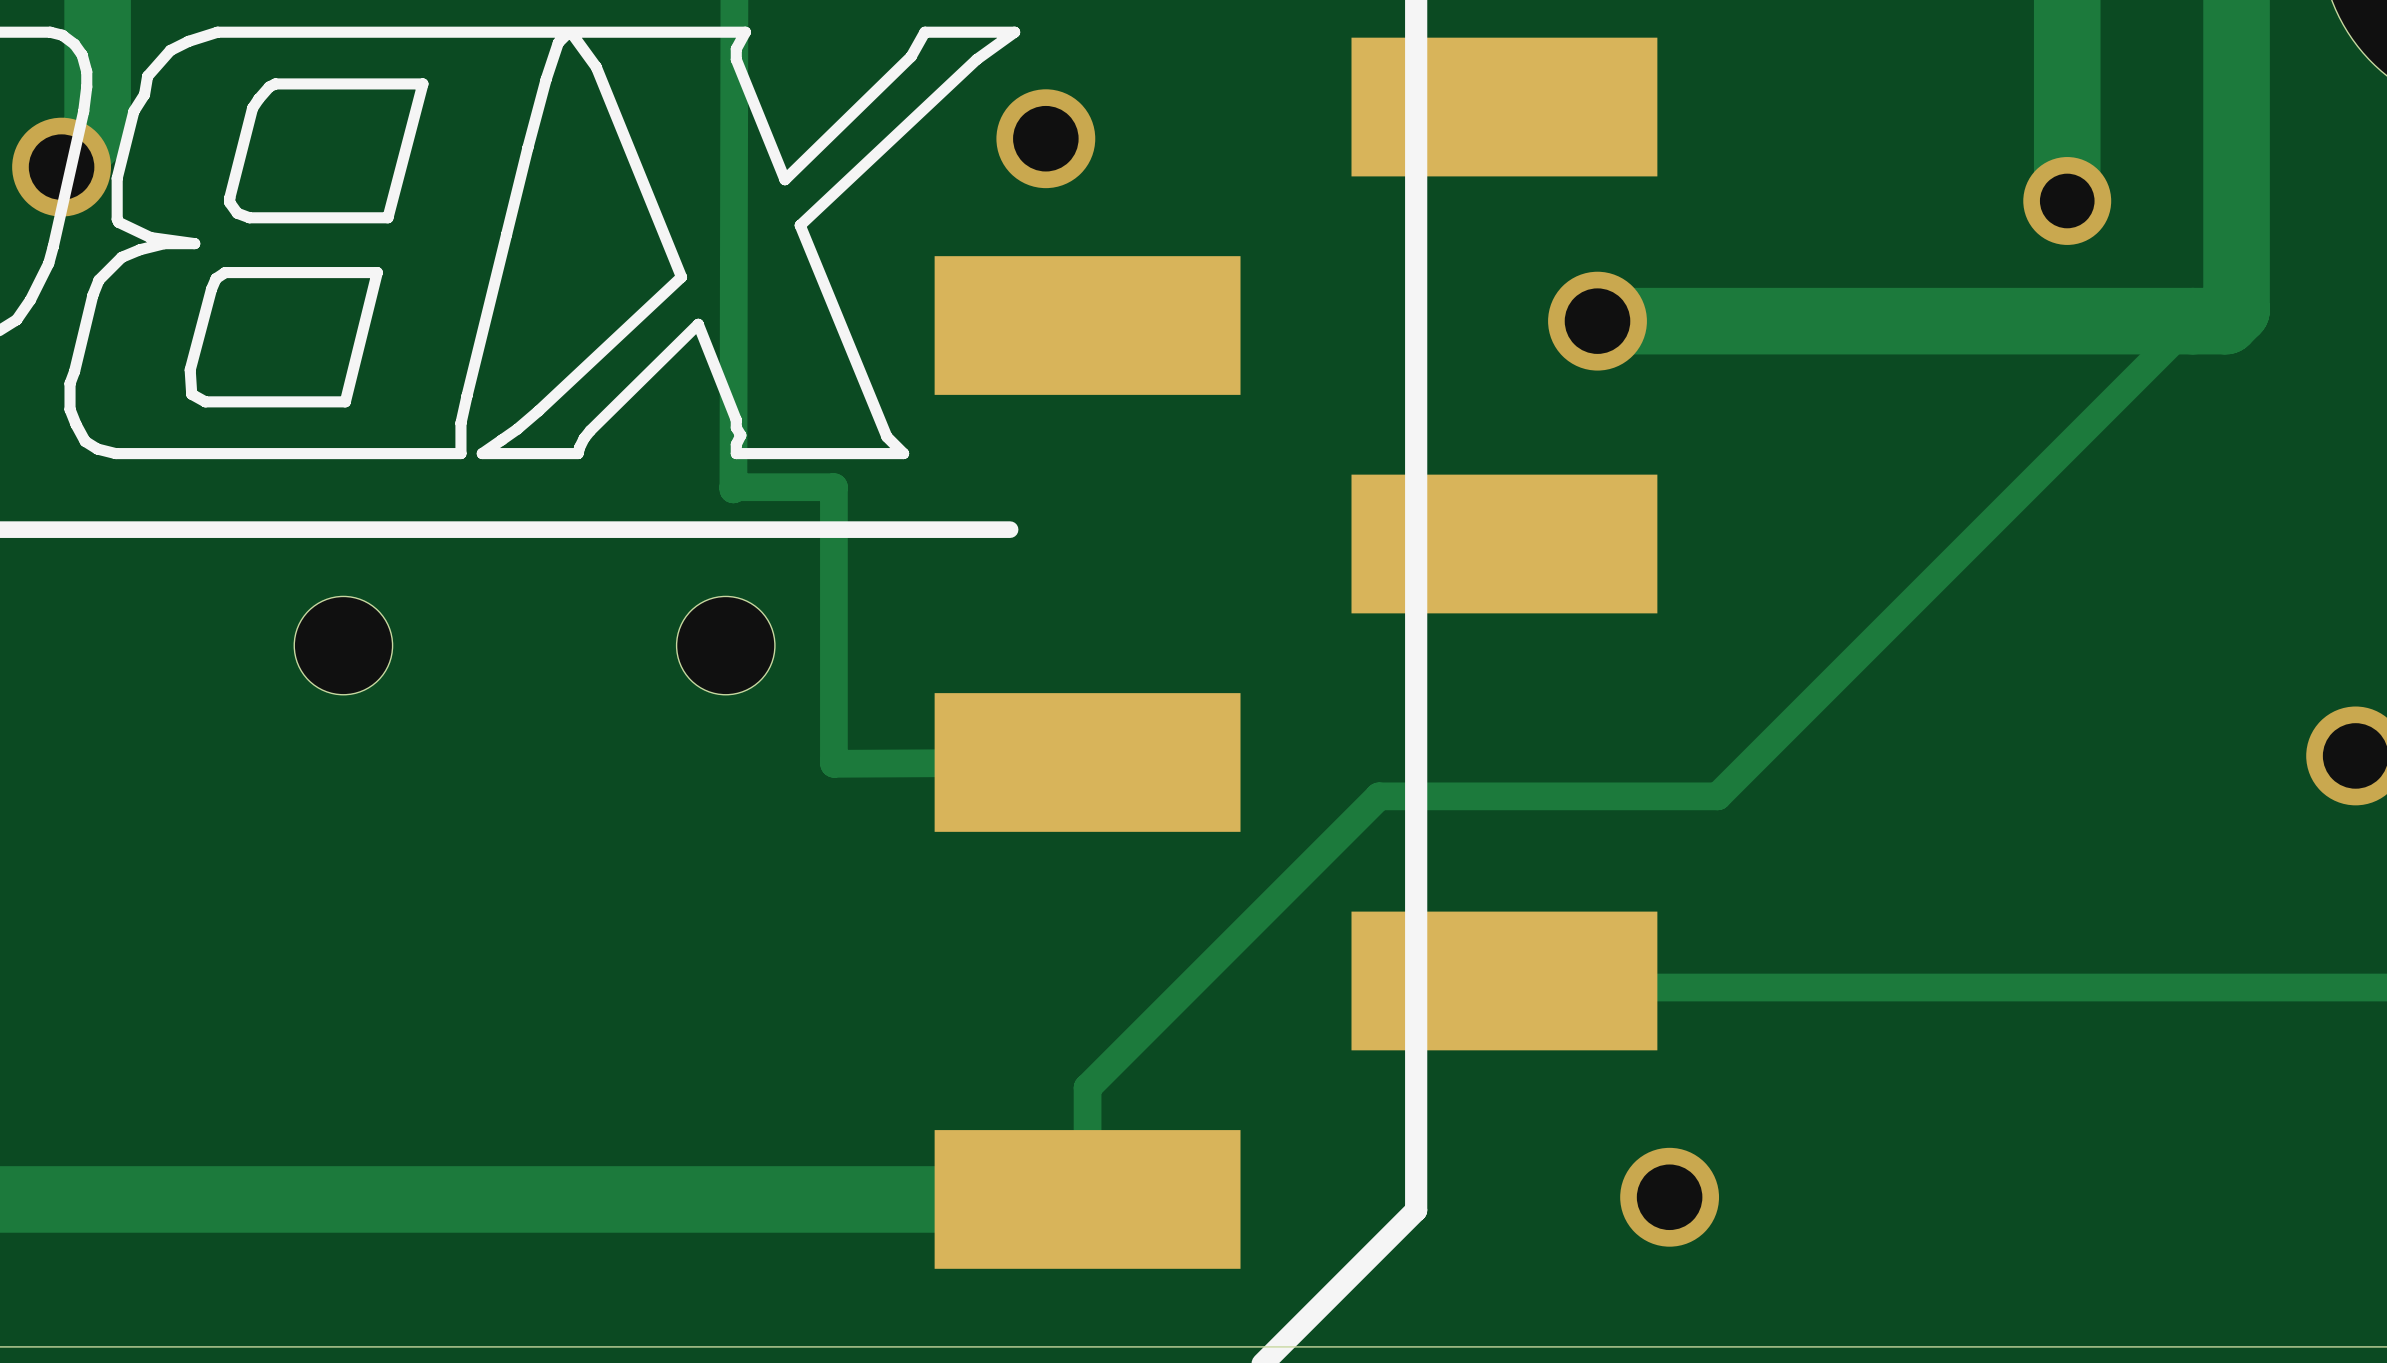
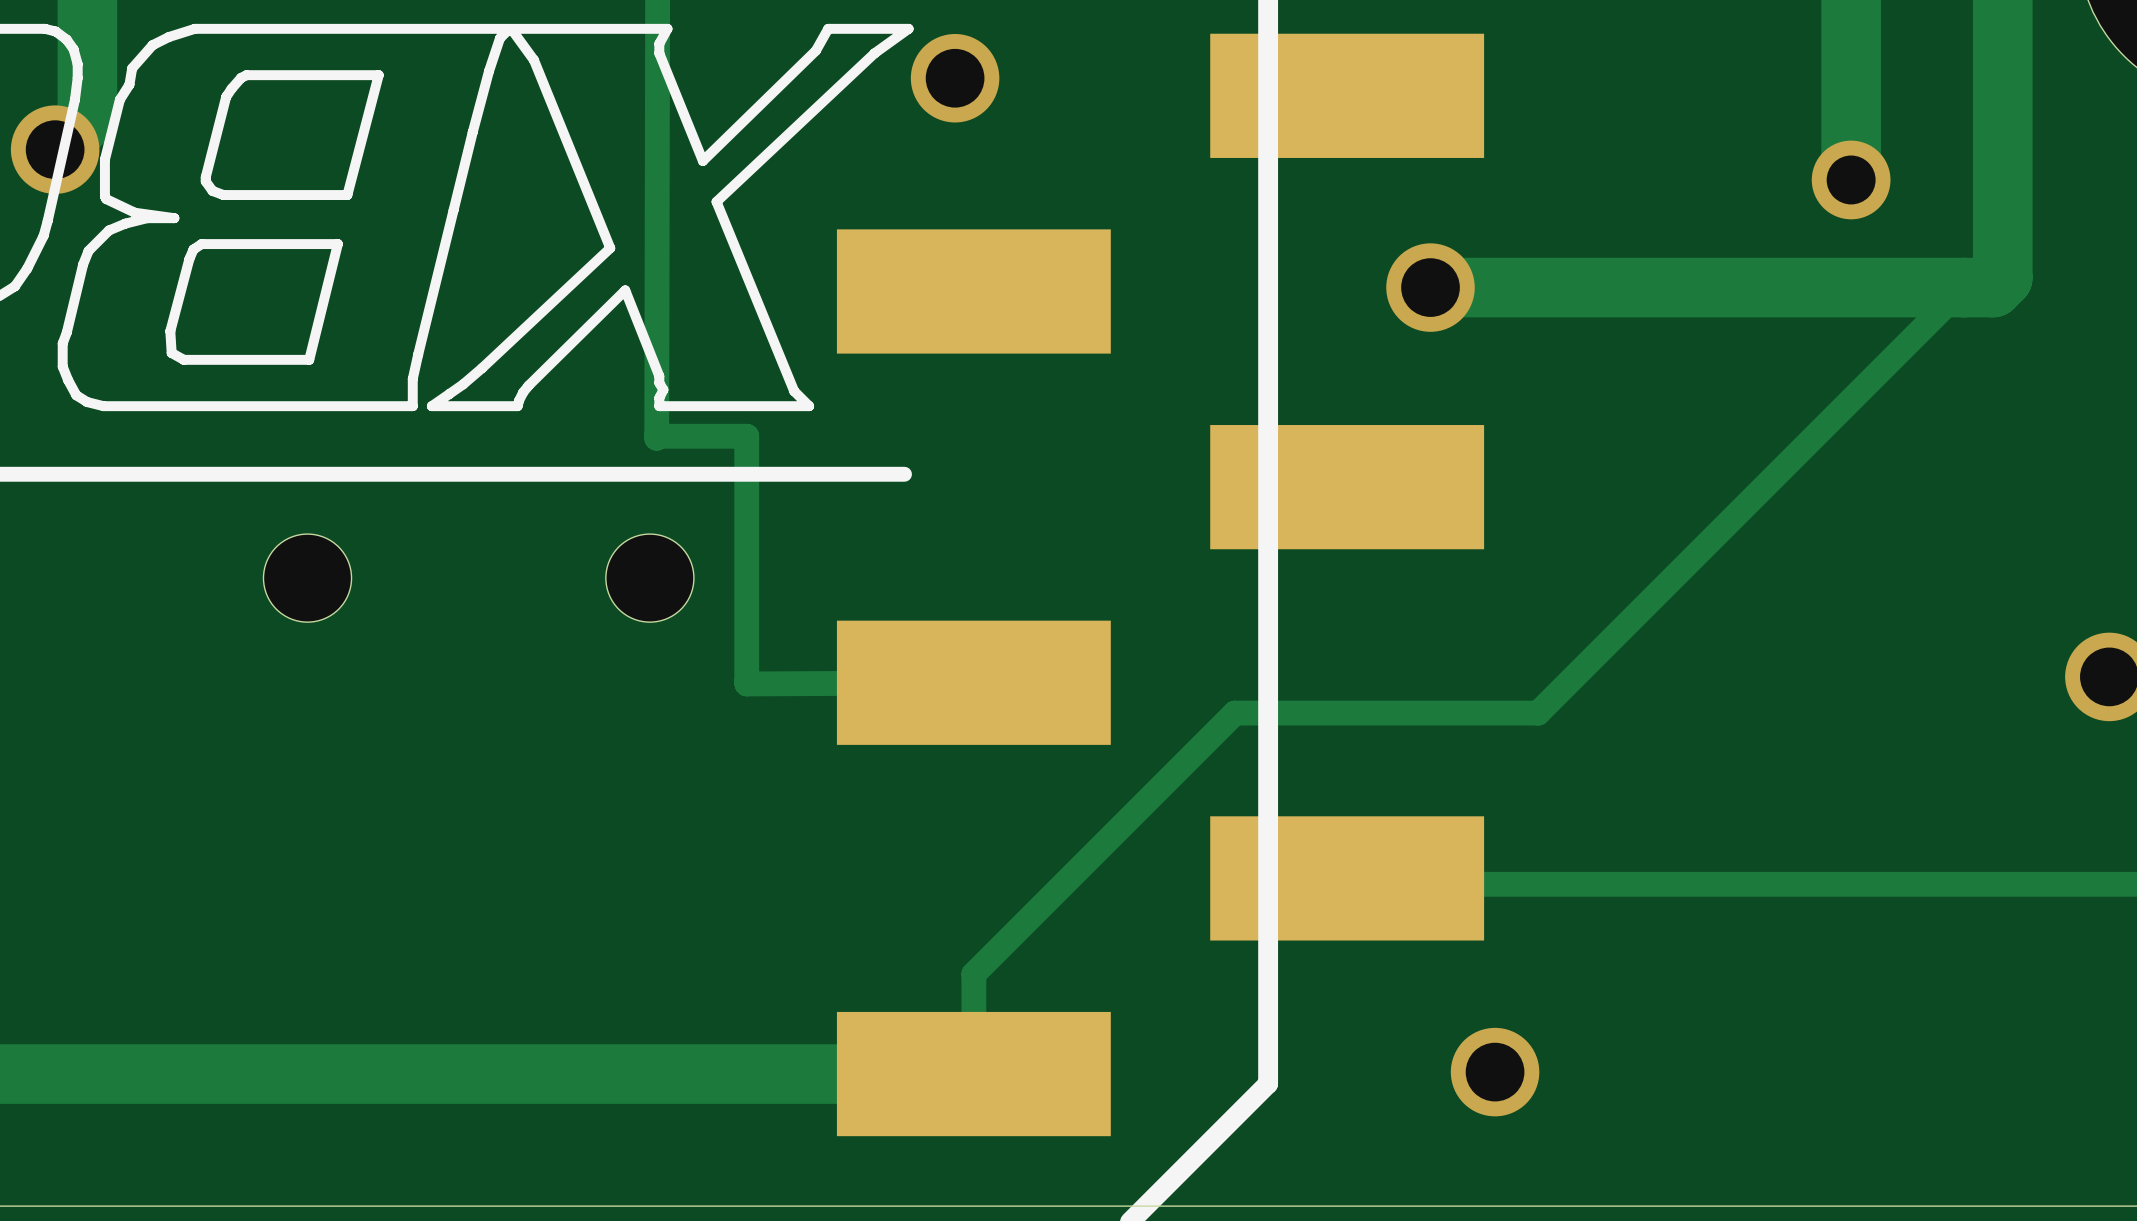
via position: (1045, 138) -> (955, 78)

